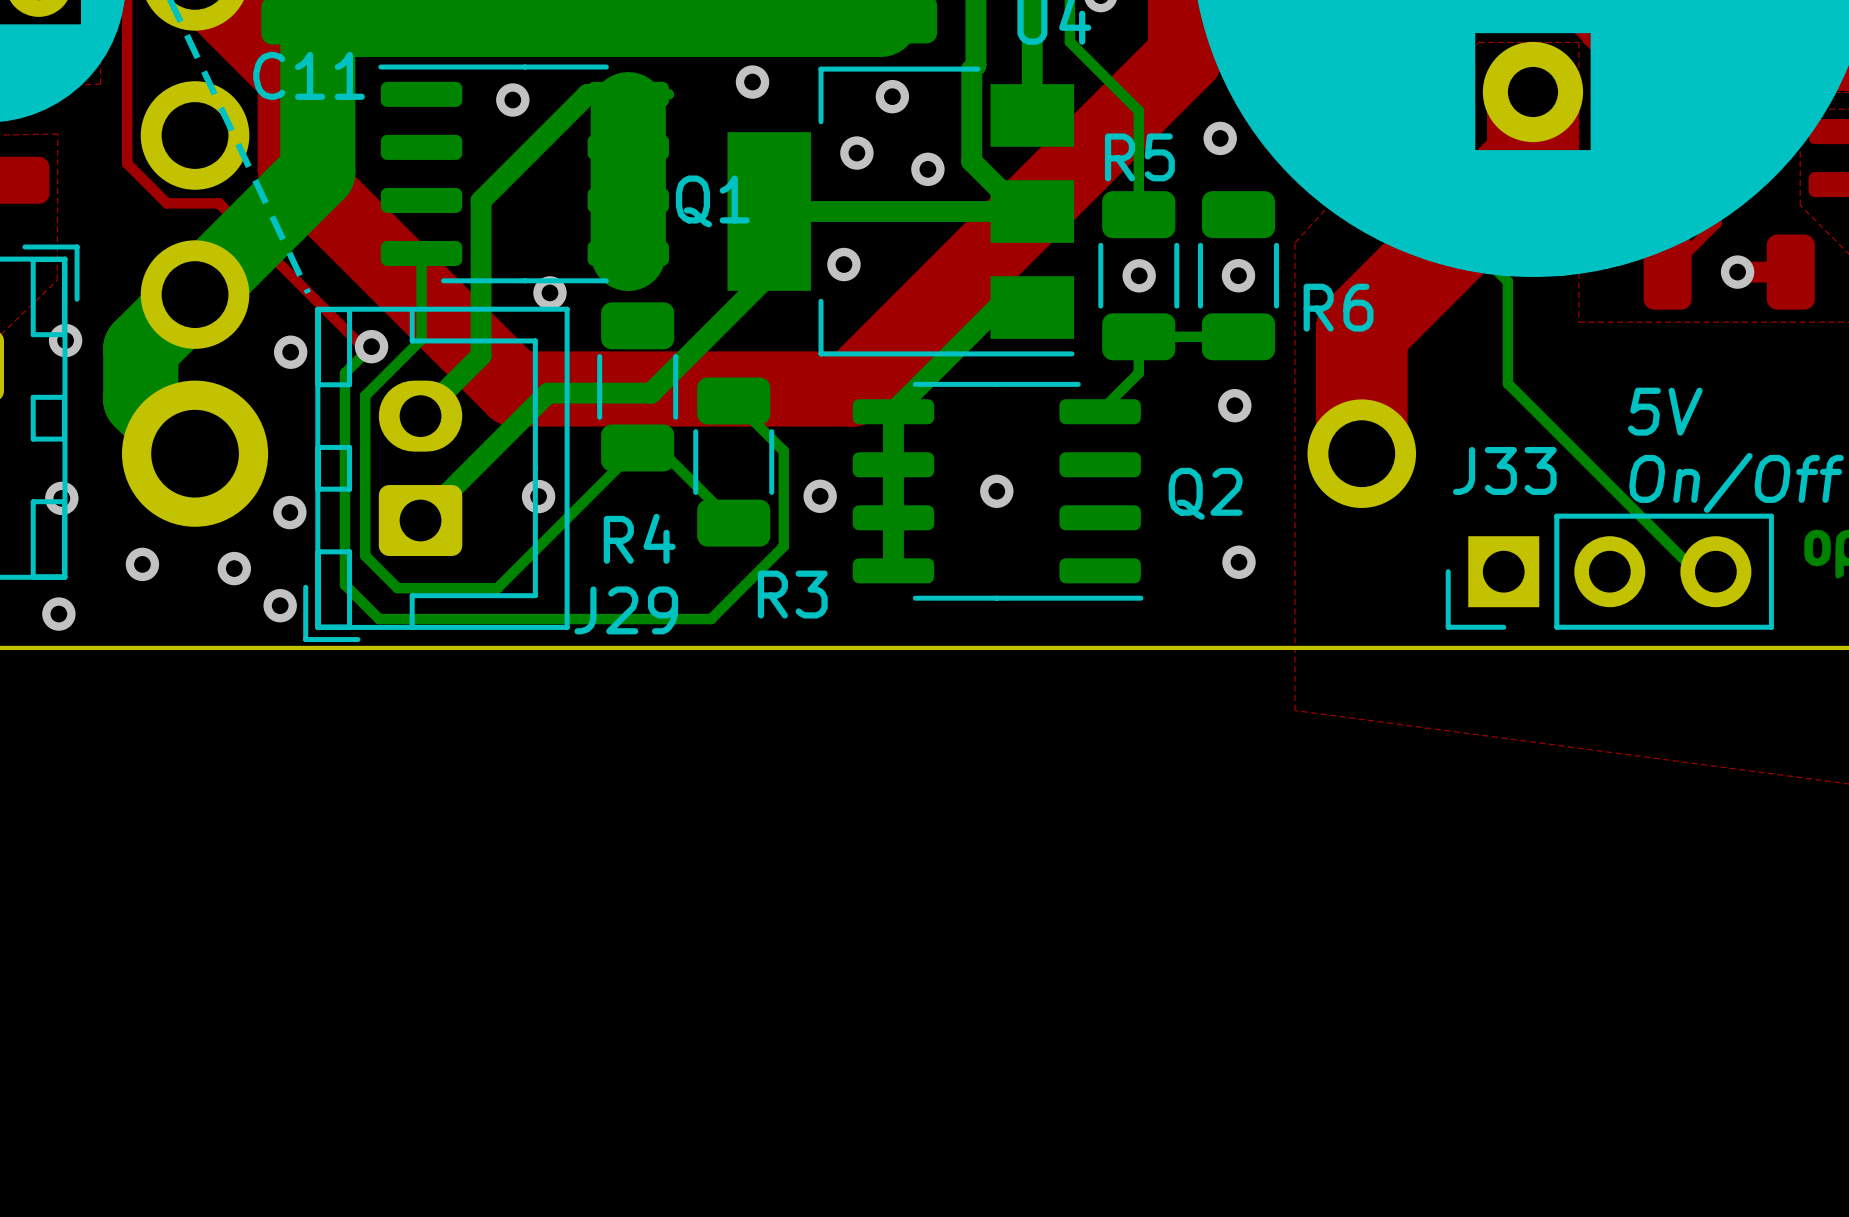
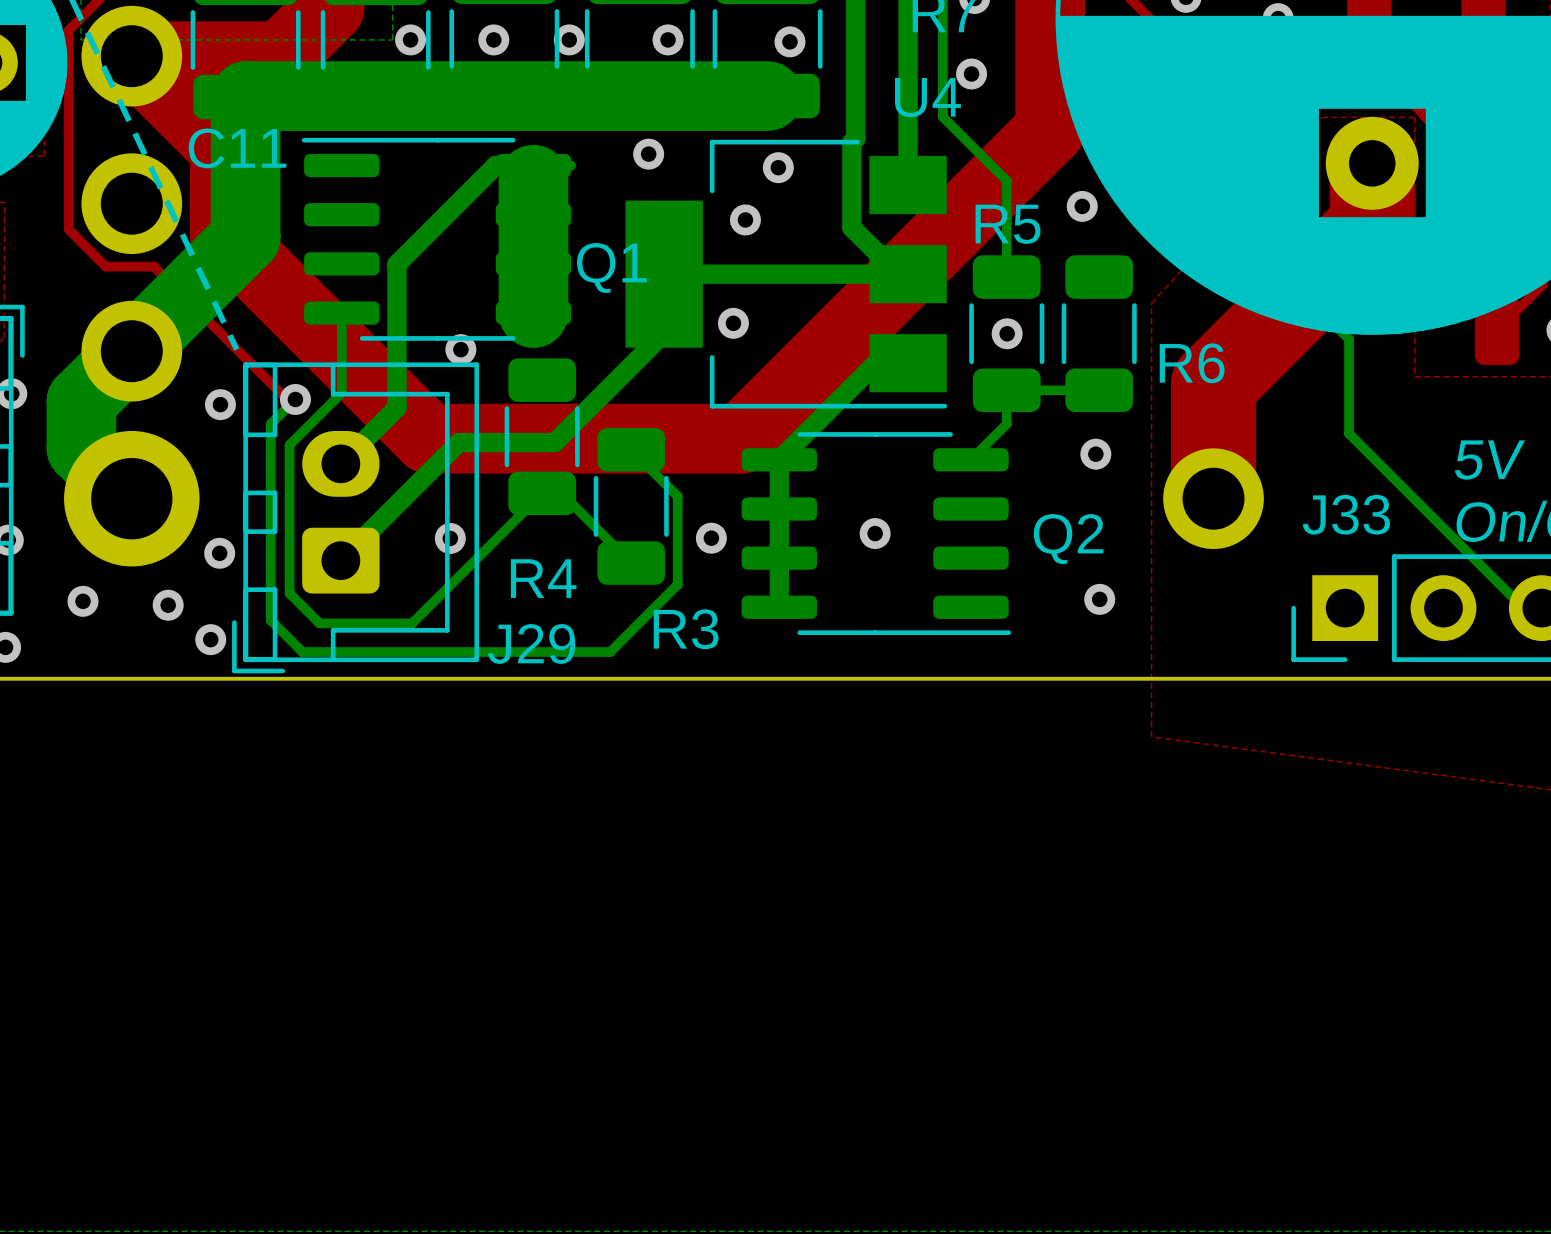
via: (512, 100) -> none
via: (927, 169) -> none
via: (1238, 275) -> none

